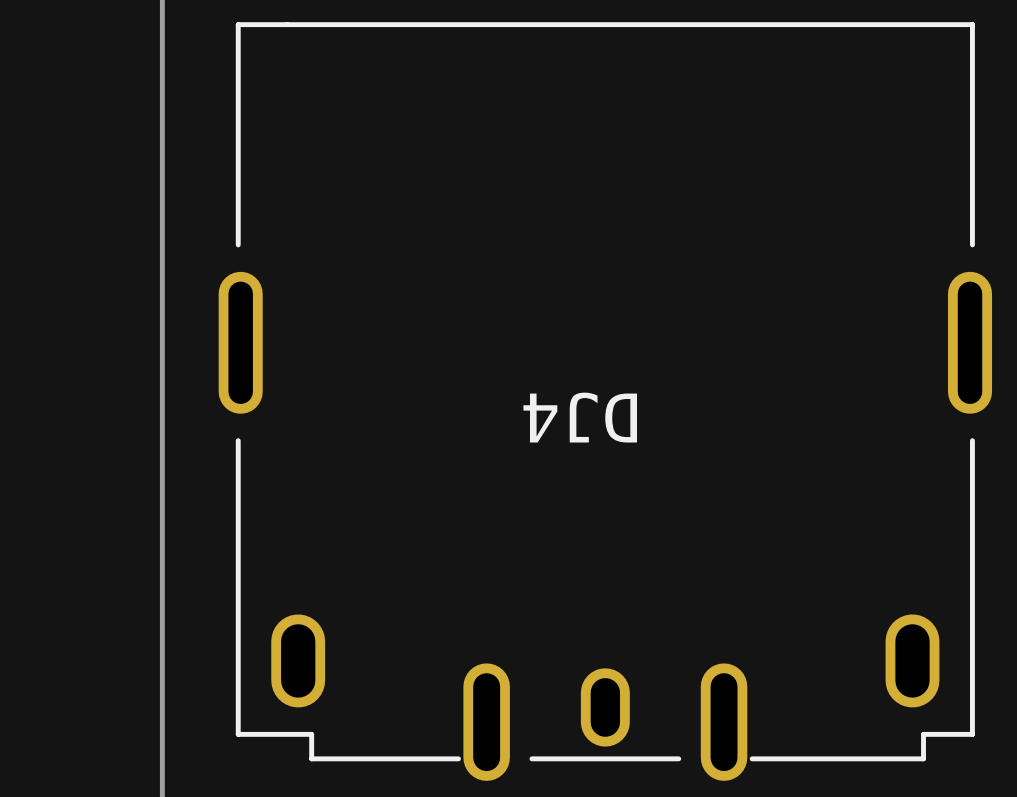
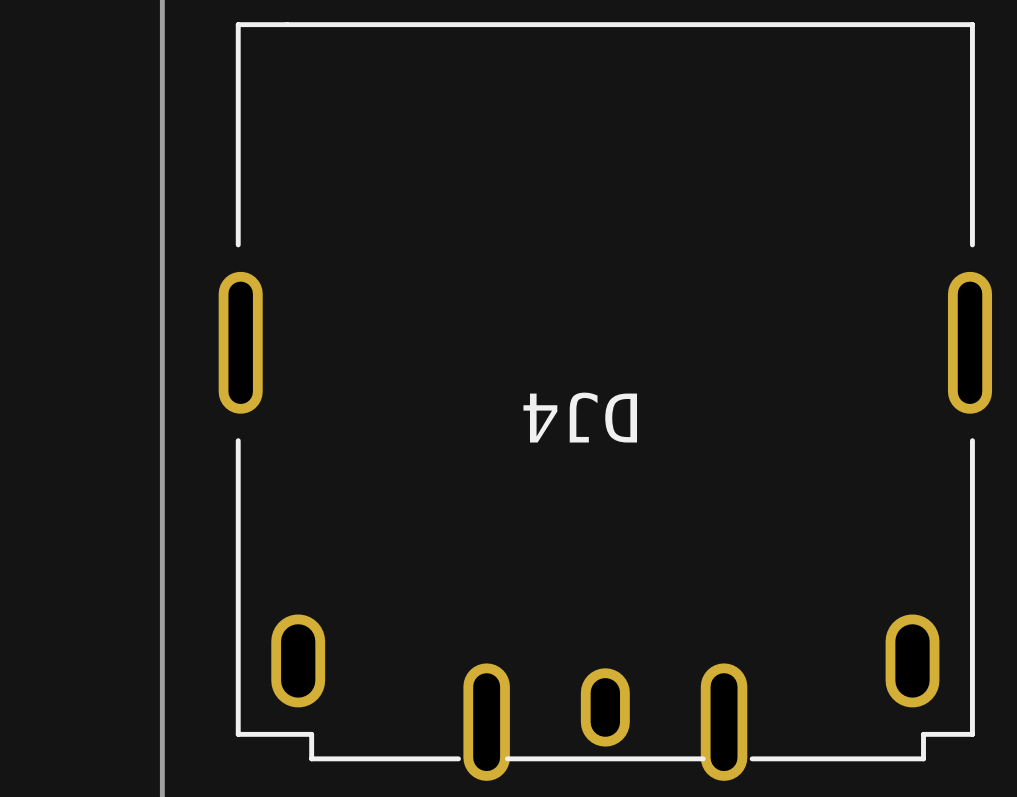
DJ4 footprint: [218, 22, 993, 781] -> [218, 22, 993, 781]

